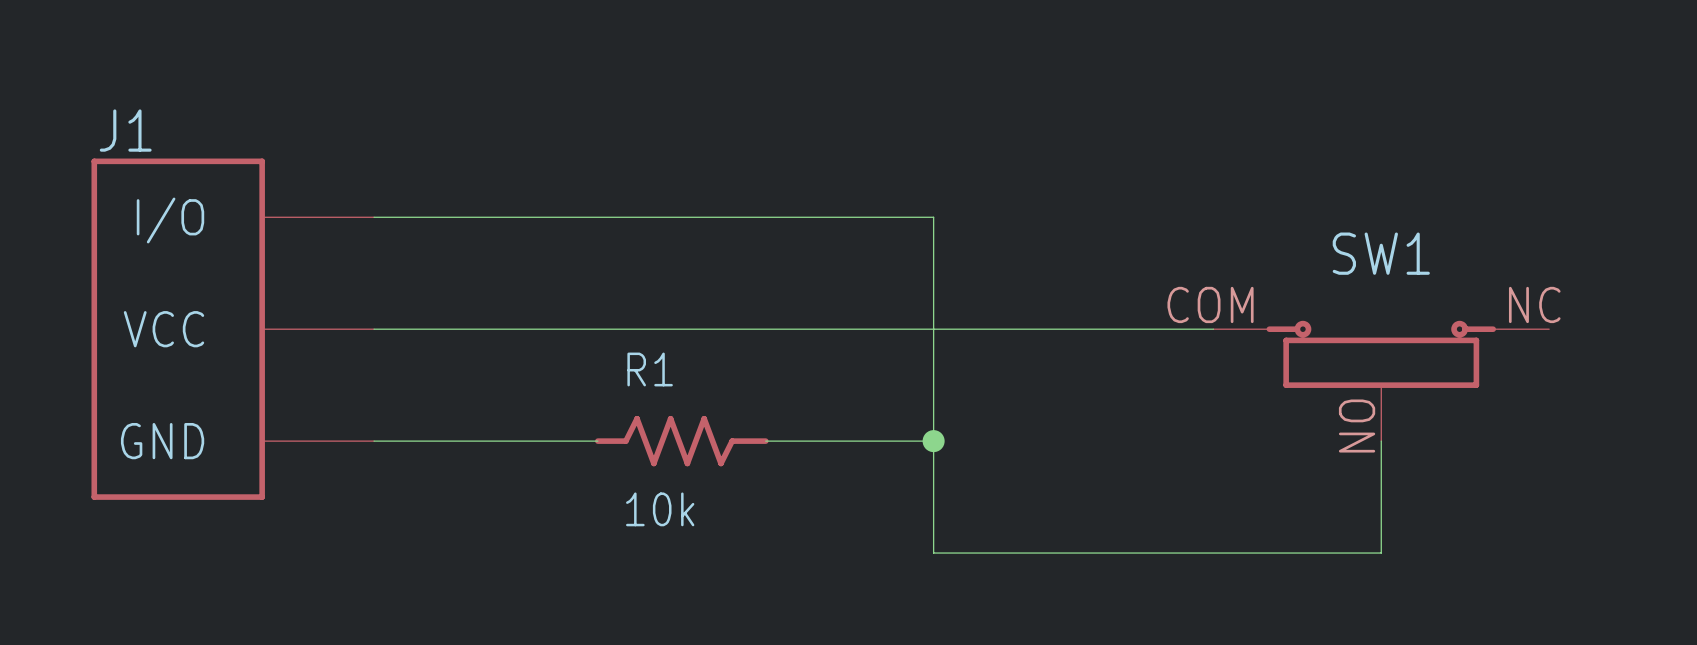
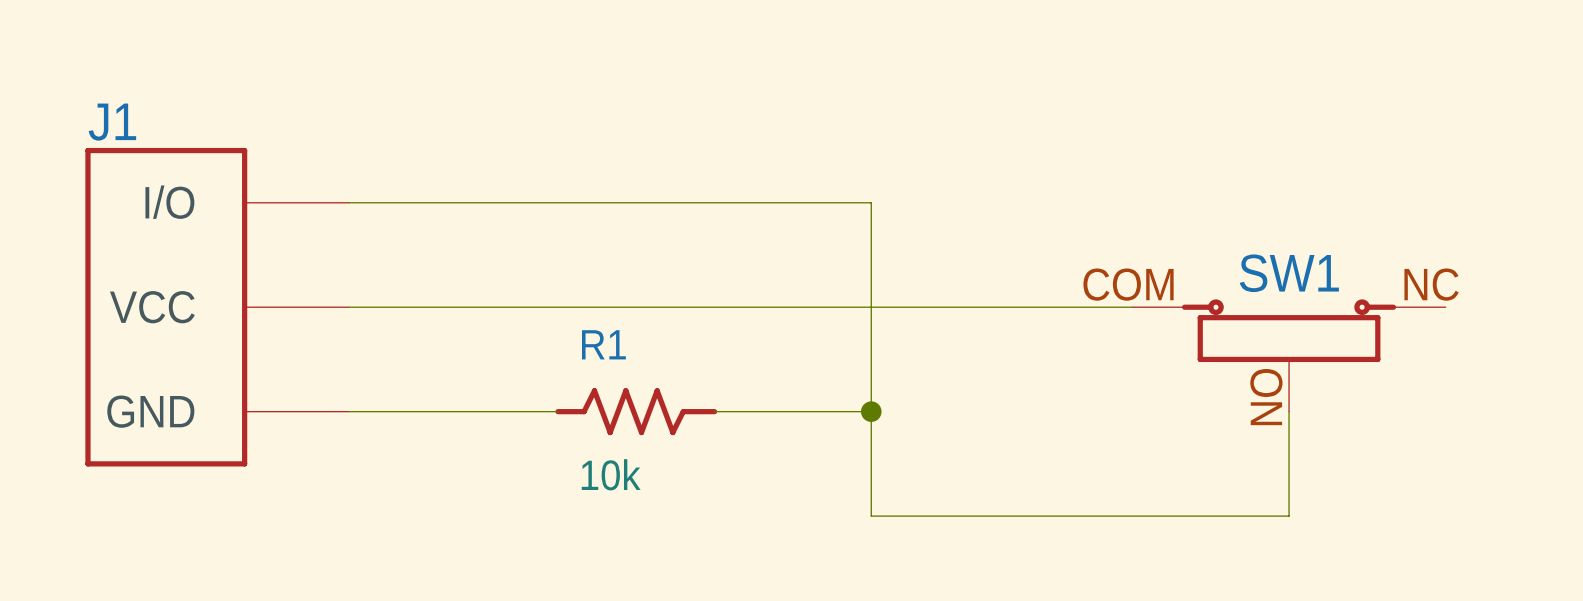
SW1 name position: SW1 (1381, 253) -> SW1 (1289, 273)

